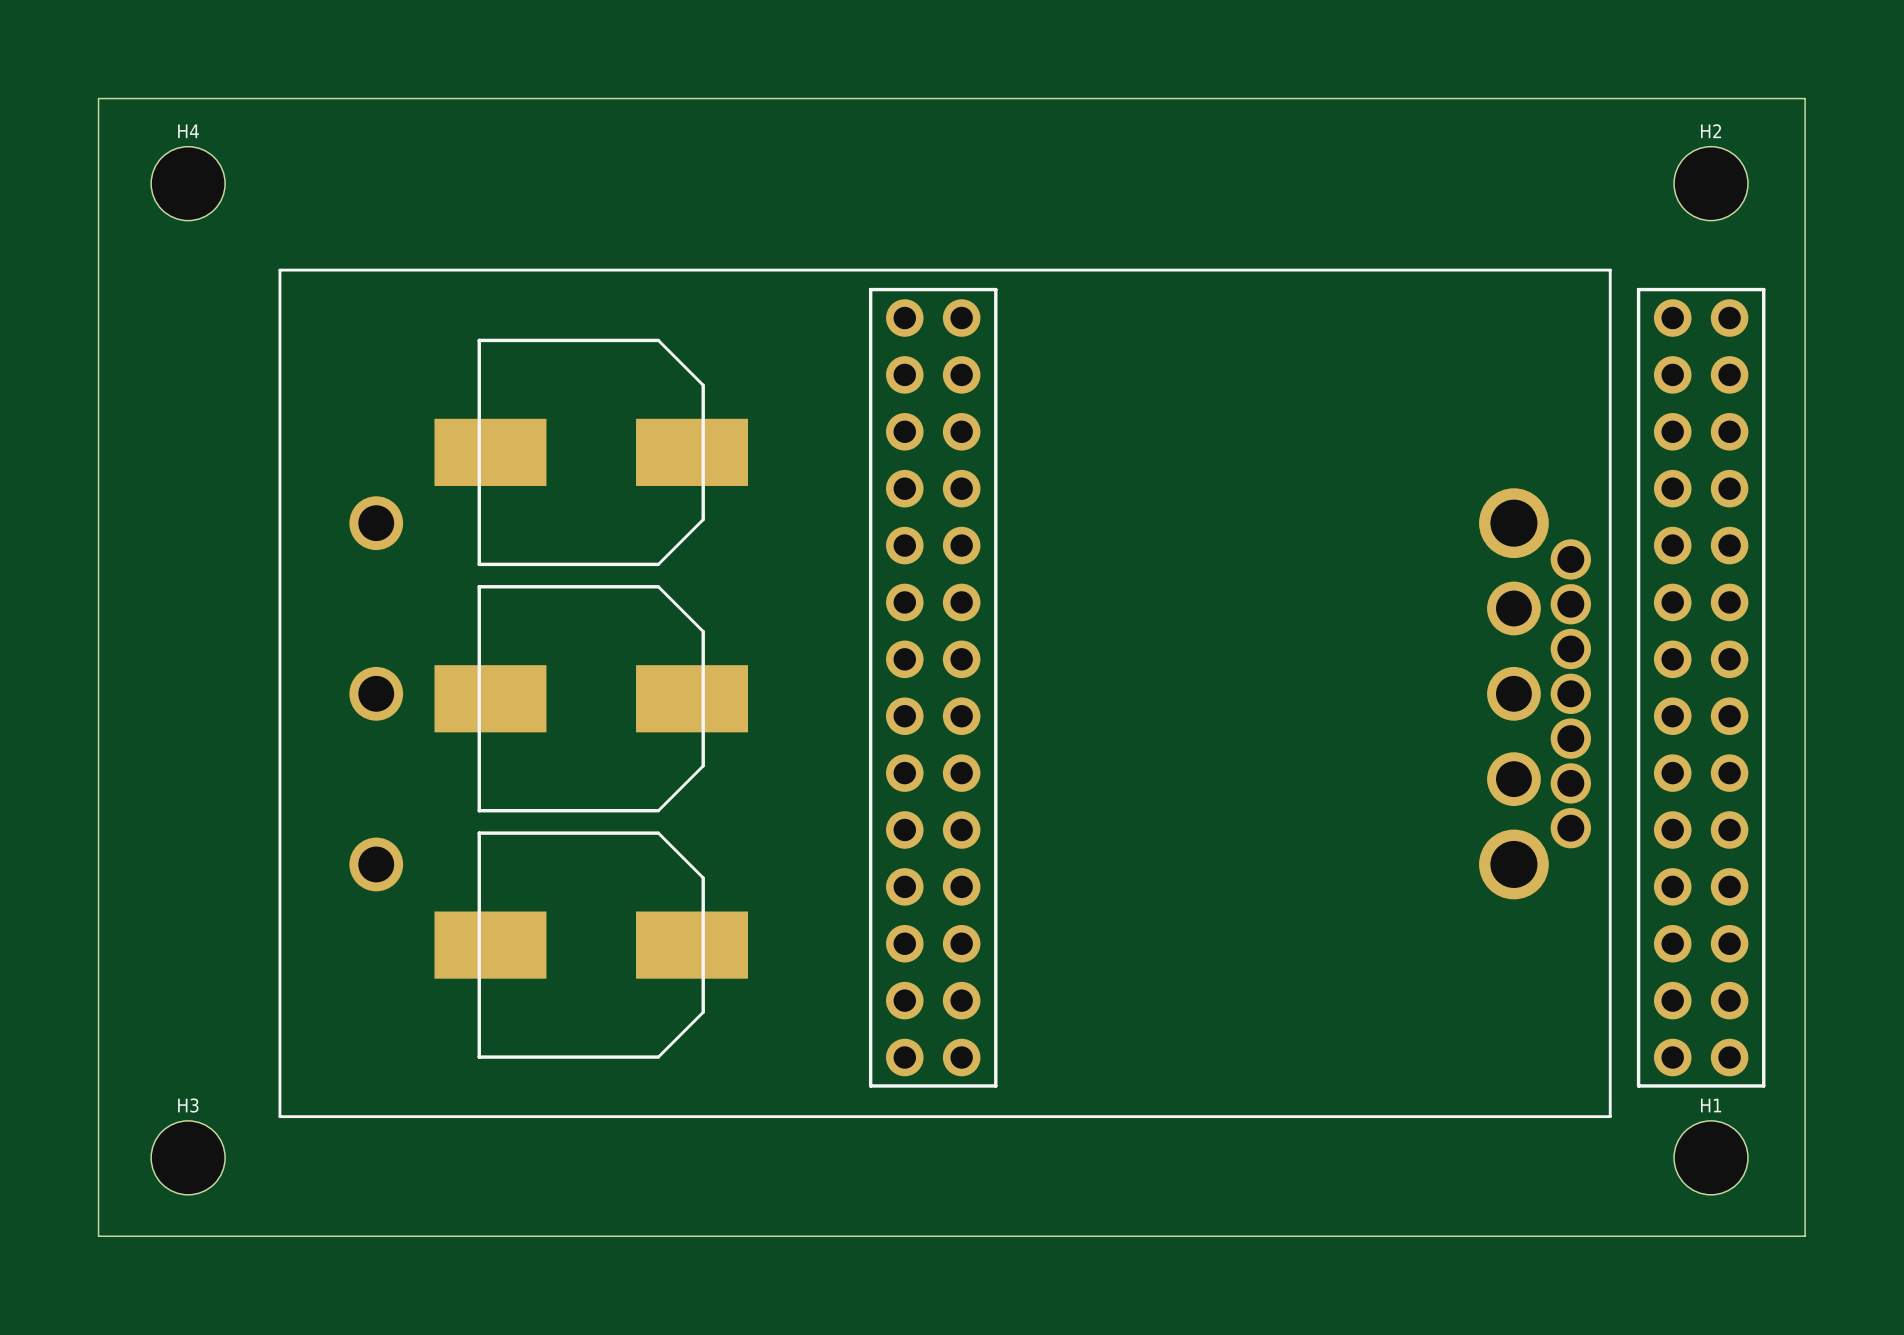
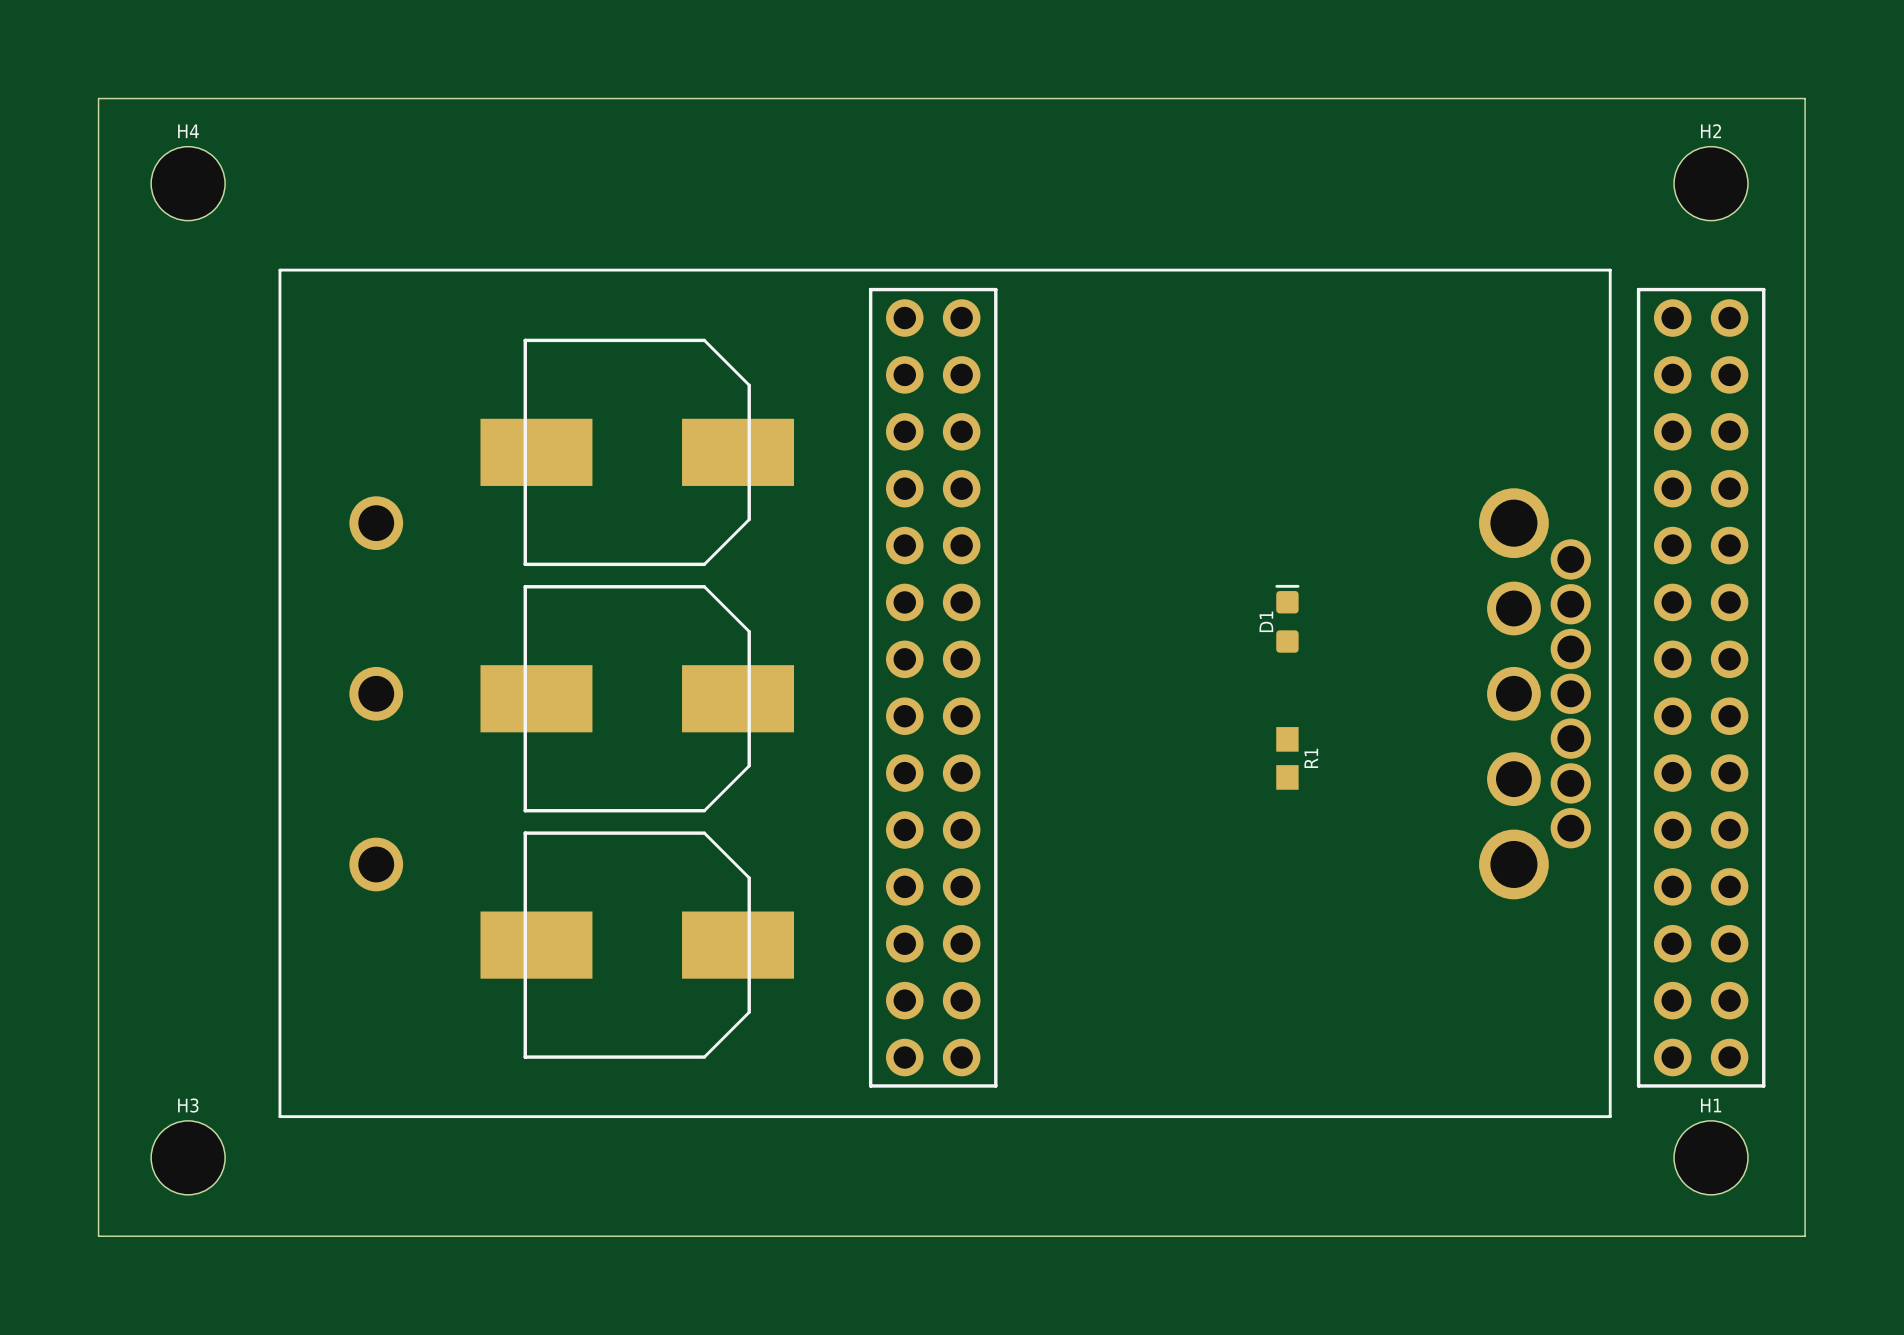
part position: (591, 452) -> (637, 452)
D1: none -> (1287, 618)
part position: (591, 698) -> (637, 698)
R1: none -> (1287, 758)
part position: (591, 945) -> (637, 945)

